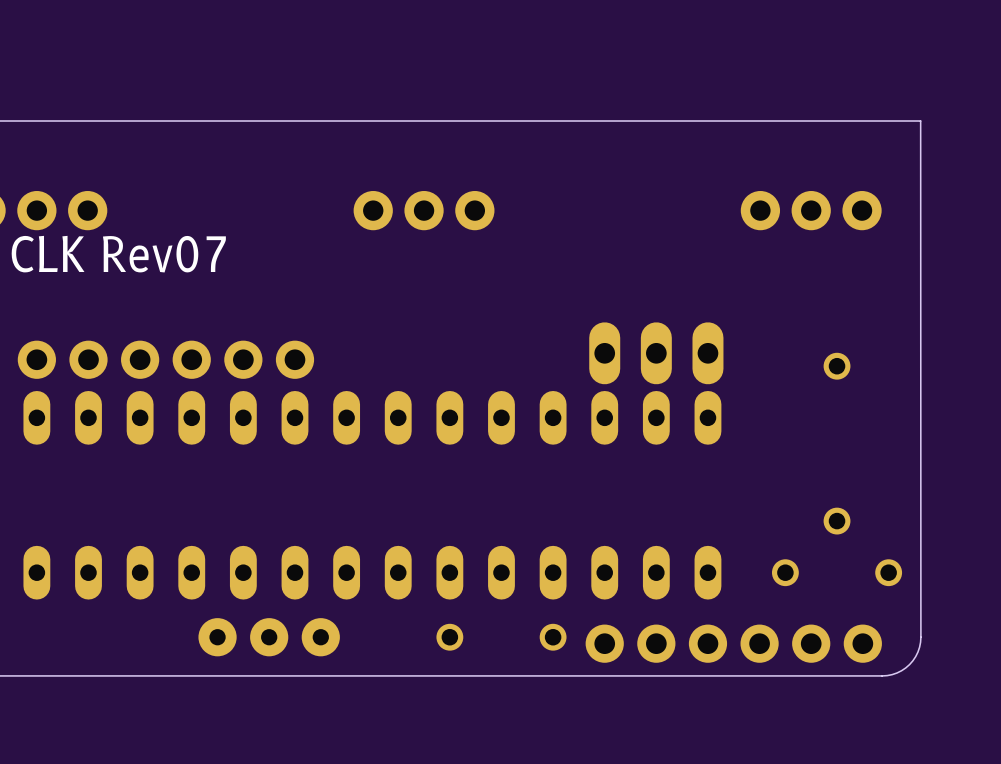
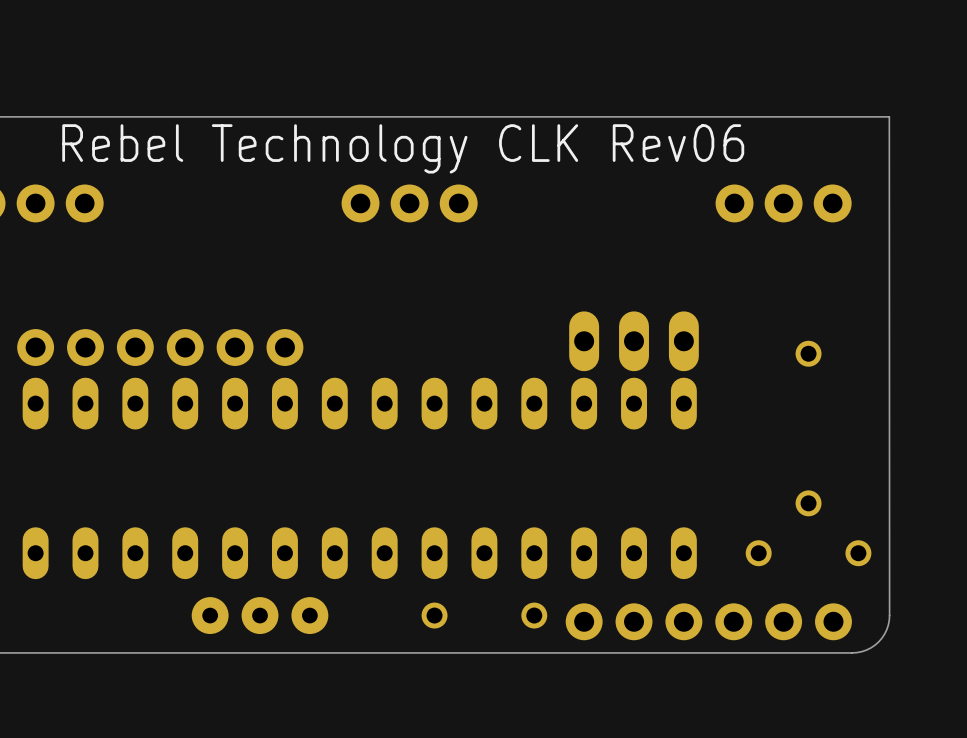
text: none -> Rebel Technology CLK Rev06 (403, 148)
text: CLK Rev07 (118, 254) -> none

